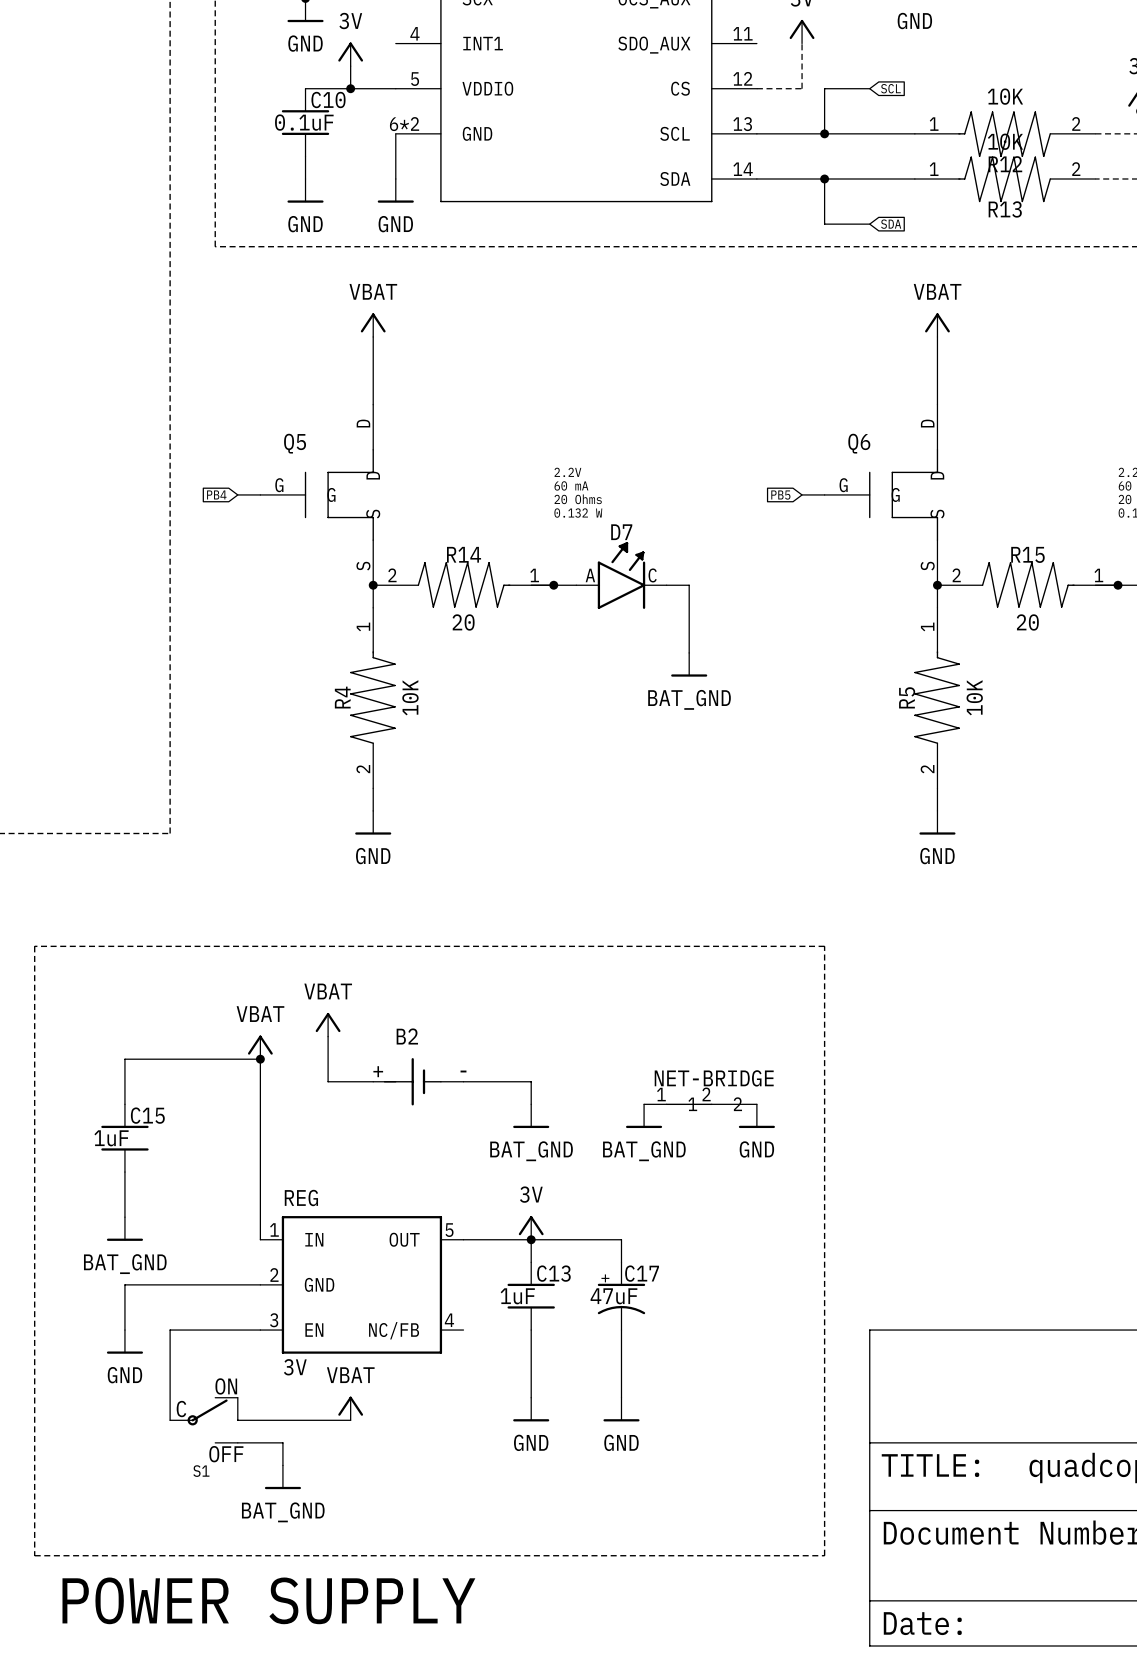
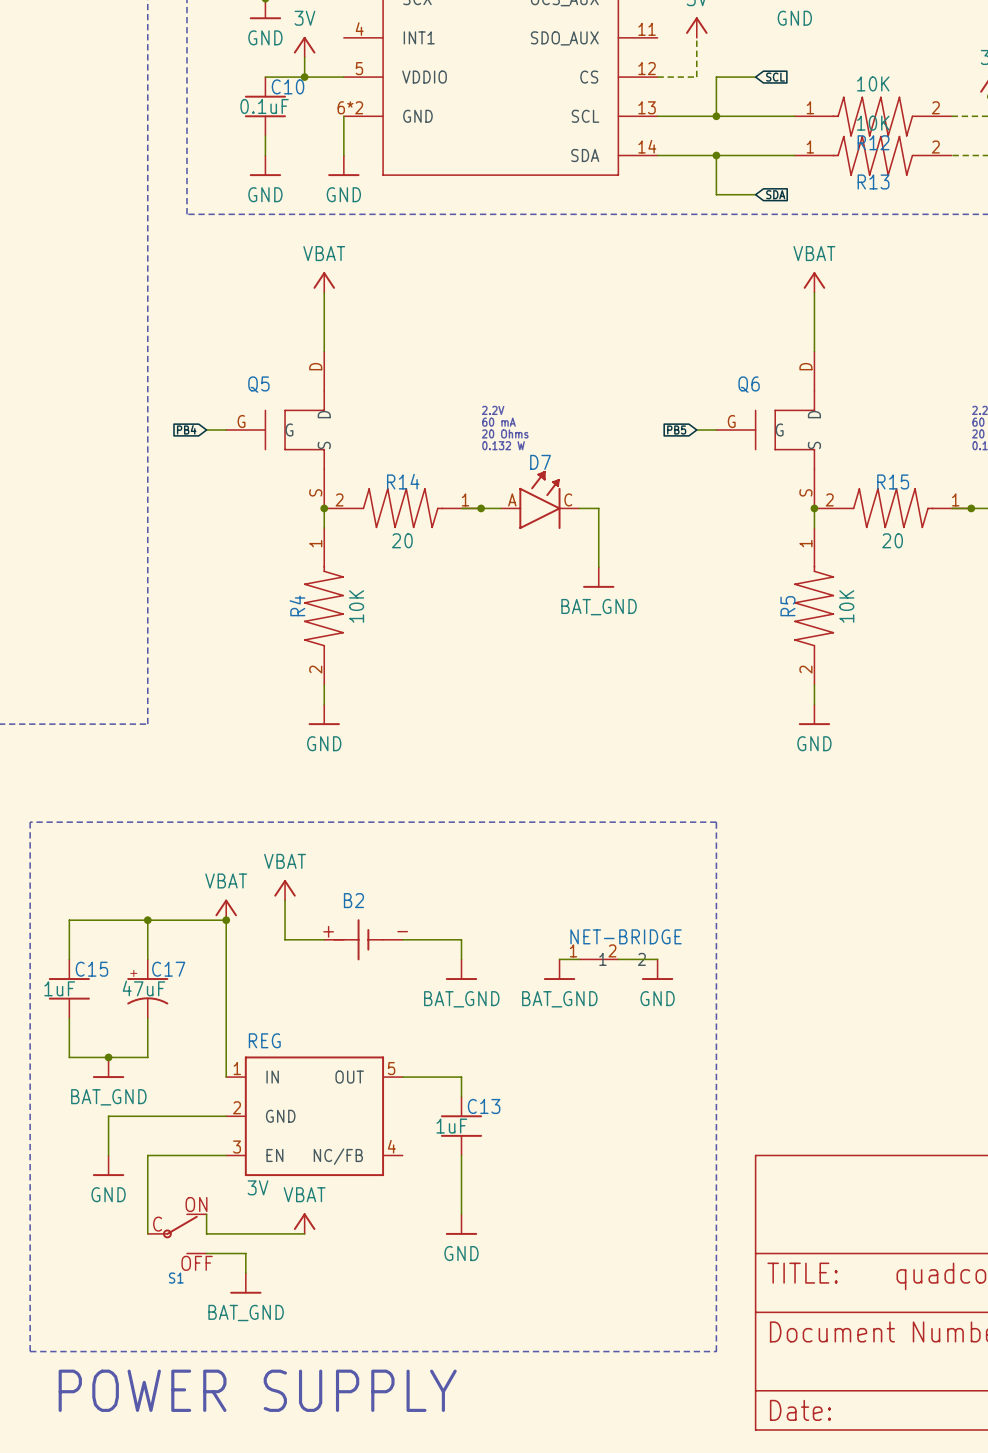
wire: (124, 1059) (124, 1104) -> (108, 920) (69, 920) (69, 959)
junction: none -> (147, 920)
C15 position: (124, 1138) -> (69, 988)
wire: none -> (69, 1018) (69, 1057) (147, 1057) (147, 1018)
wire: (124, 1172) (124, 1217) -> (147, 920) (147, 959)
junction: none -> (108, 1057)
power symbol: 3V (531, 1227) -> none
wire: (531, 1239) (621, 1239) (621, 1262) -> none
junction: (531, 1239) -> none
C17 position: (621, 1296) -> (147, 988)
wire: (621, 1330) (621, 1397) -> none
power symbol: GND (621, 1409) -> none

